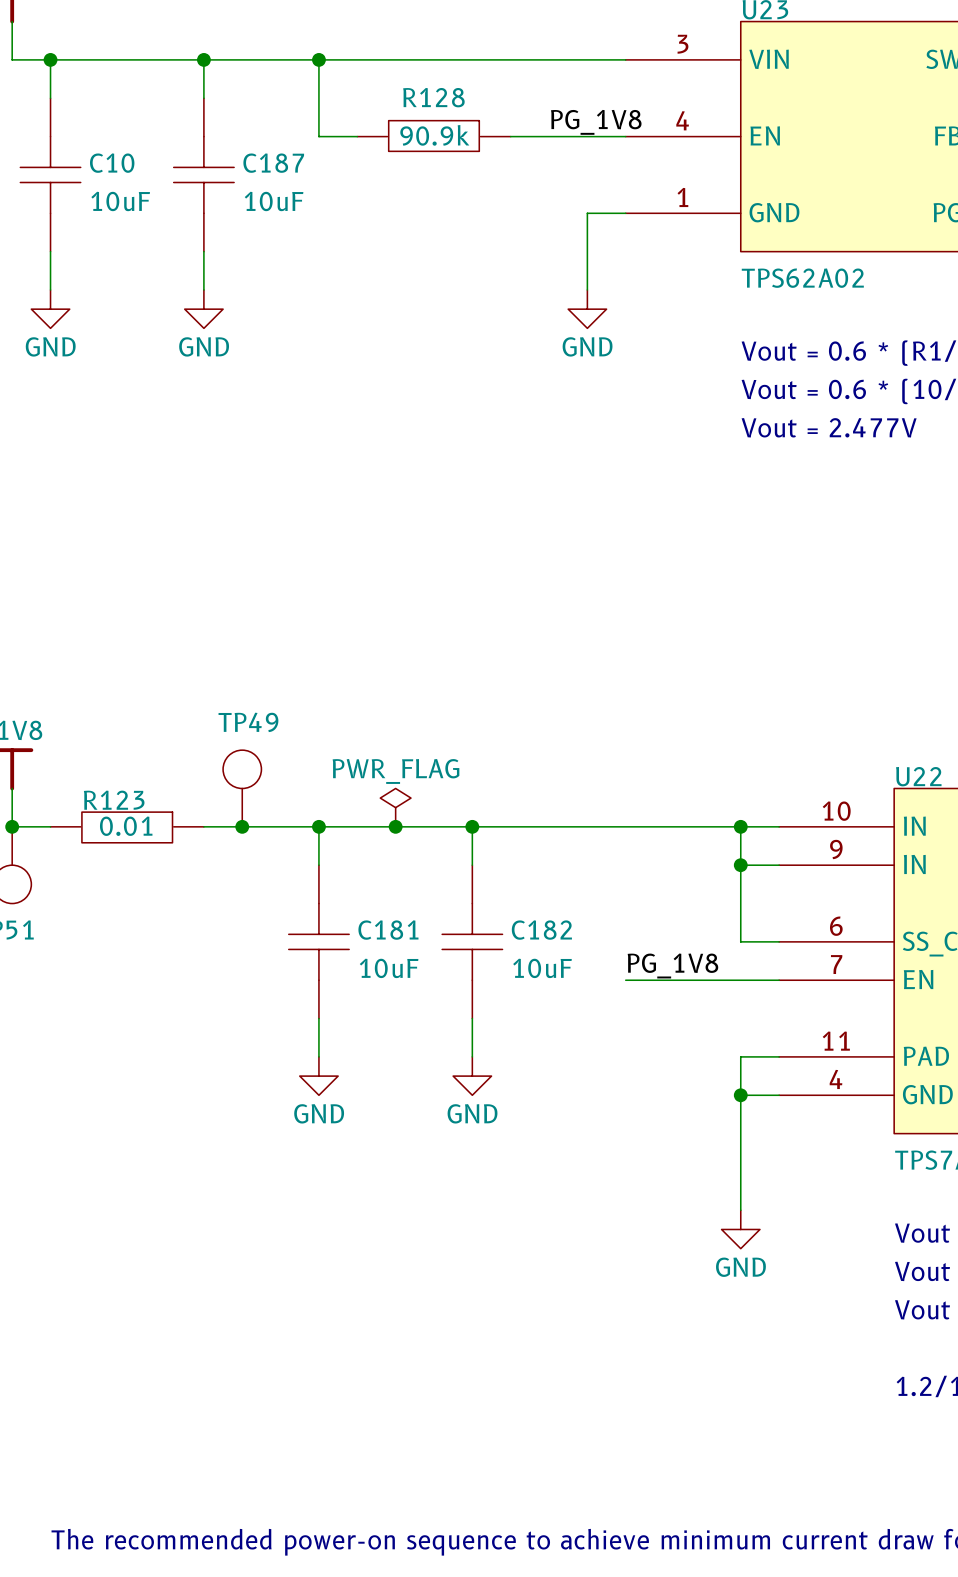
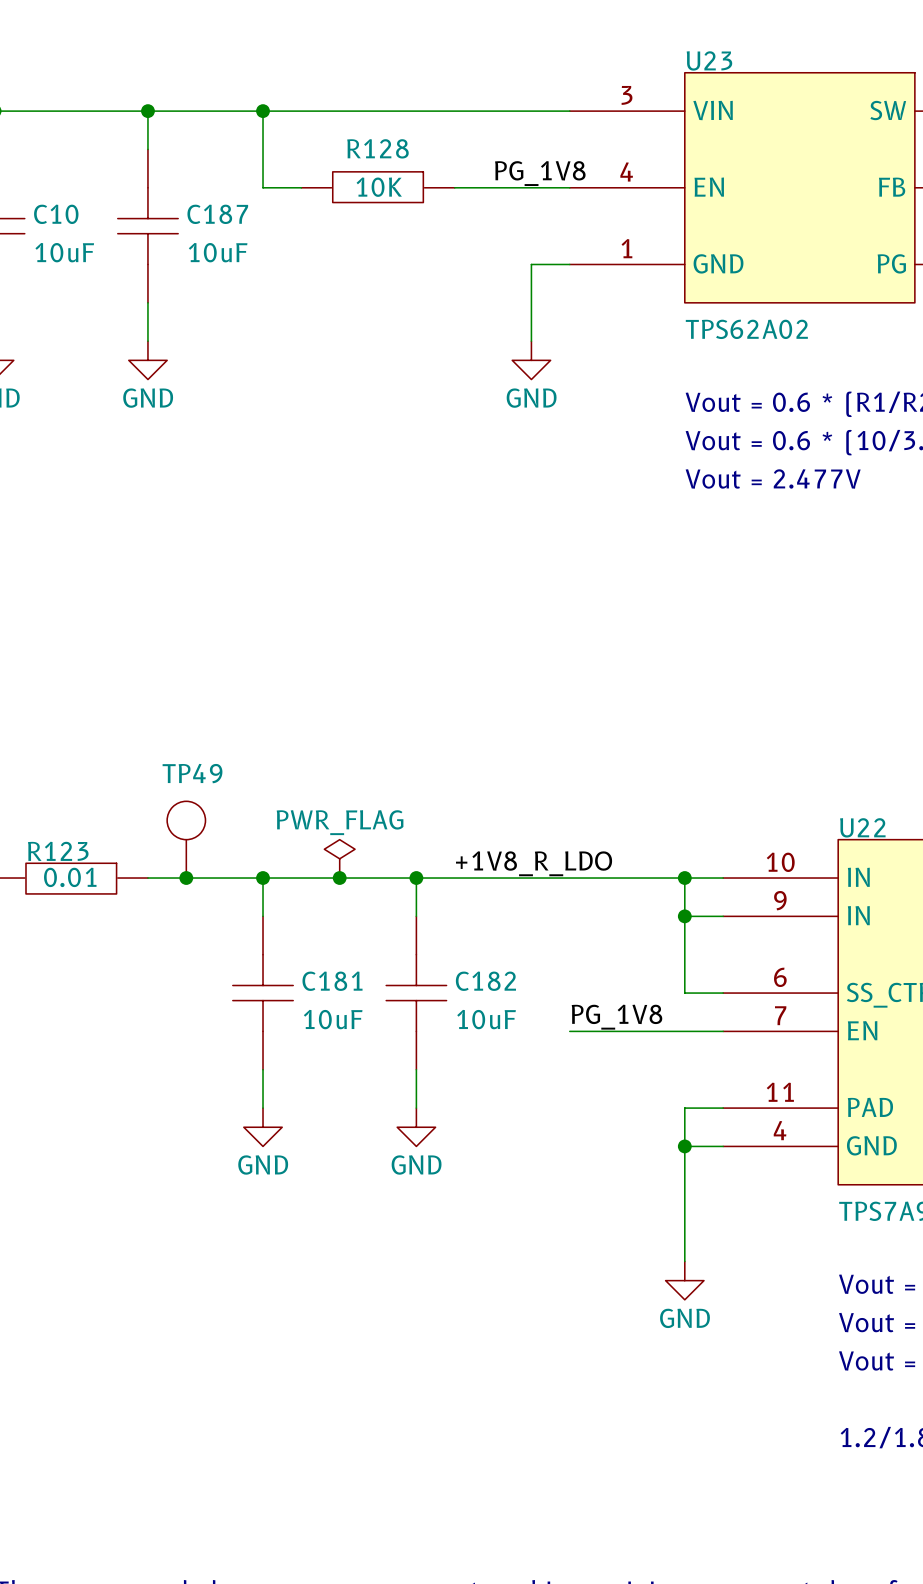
R128 value: 90.9k (434, 135) -> 10K (379, 187)
label: none -> +1V8_R_LDO (534, 863)

